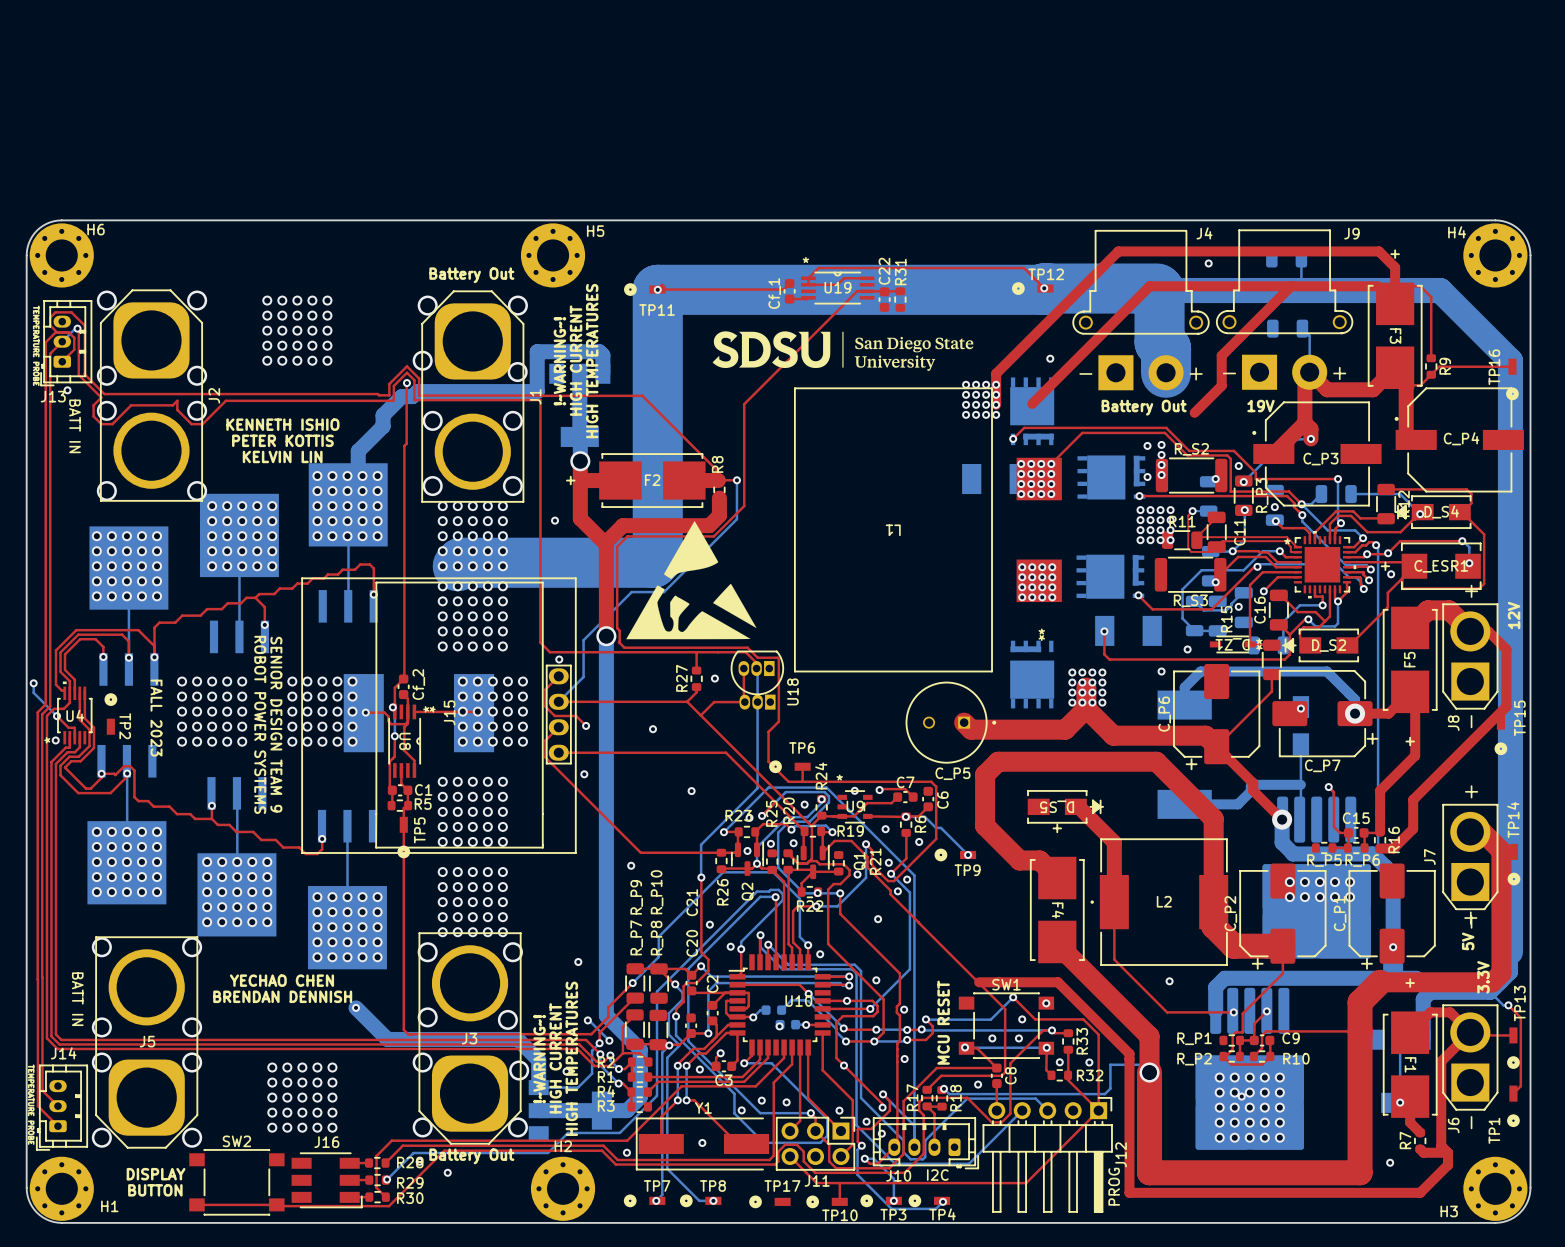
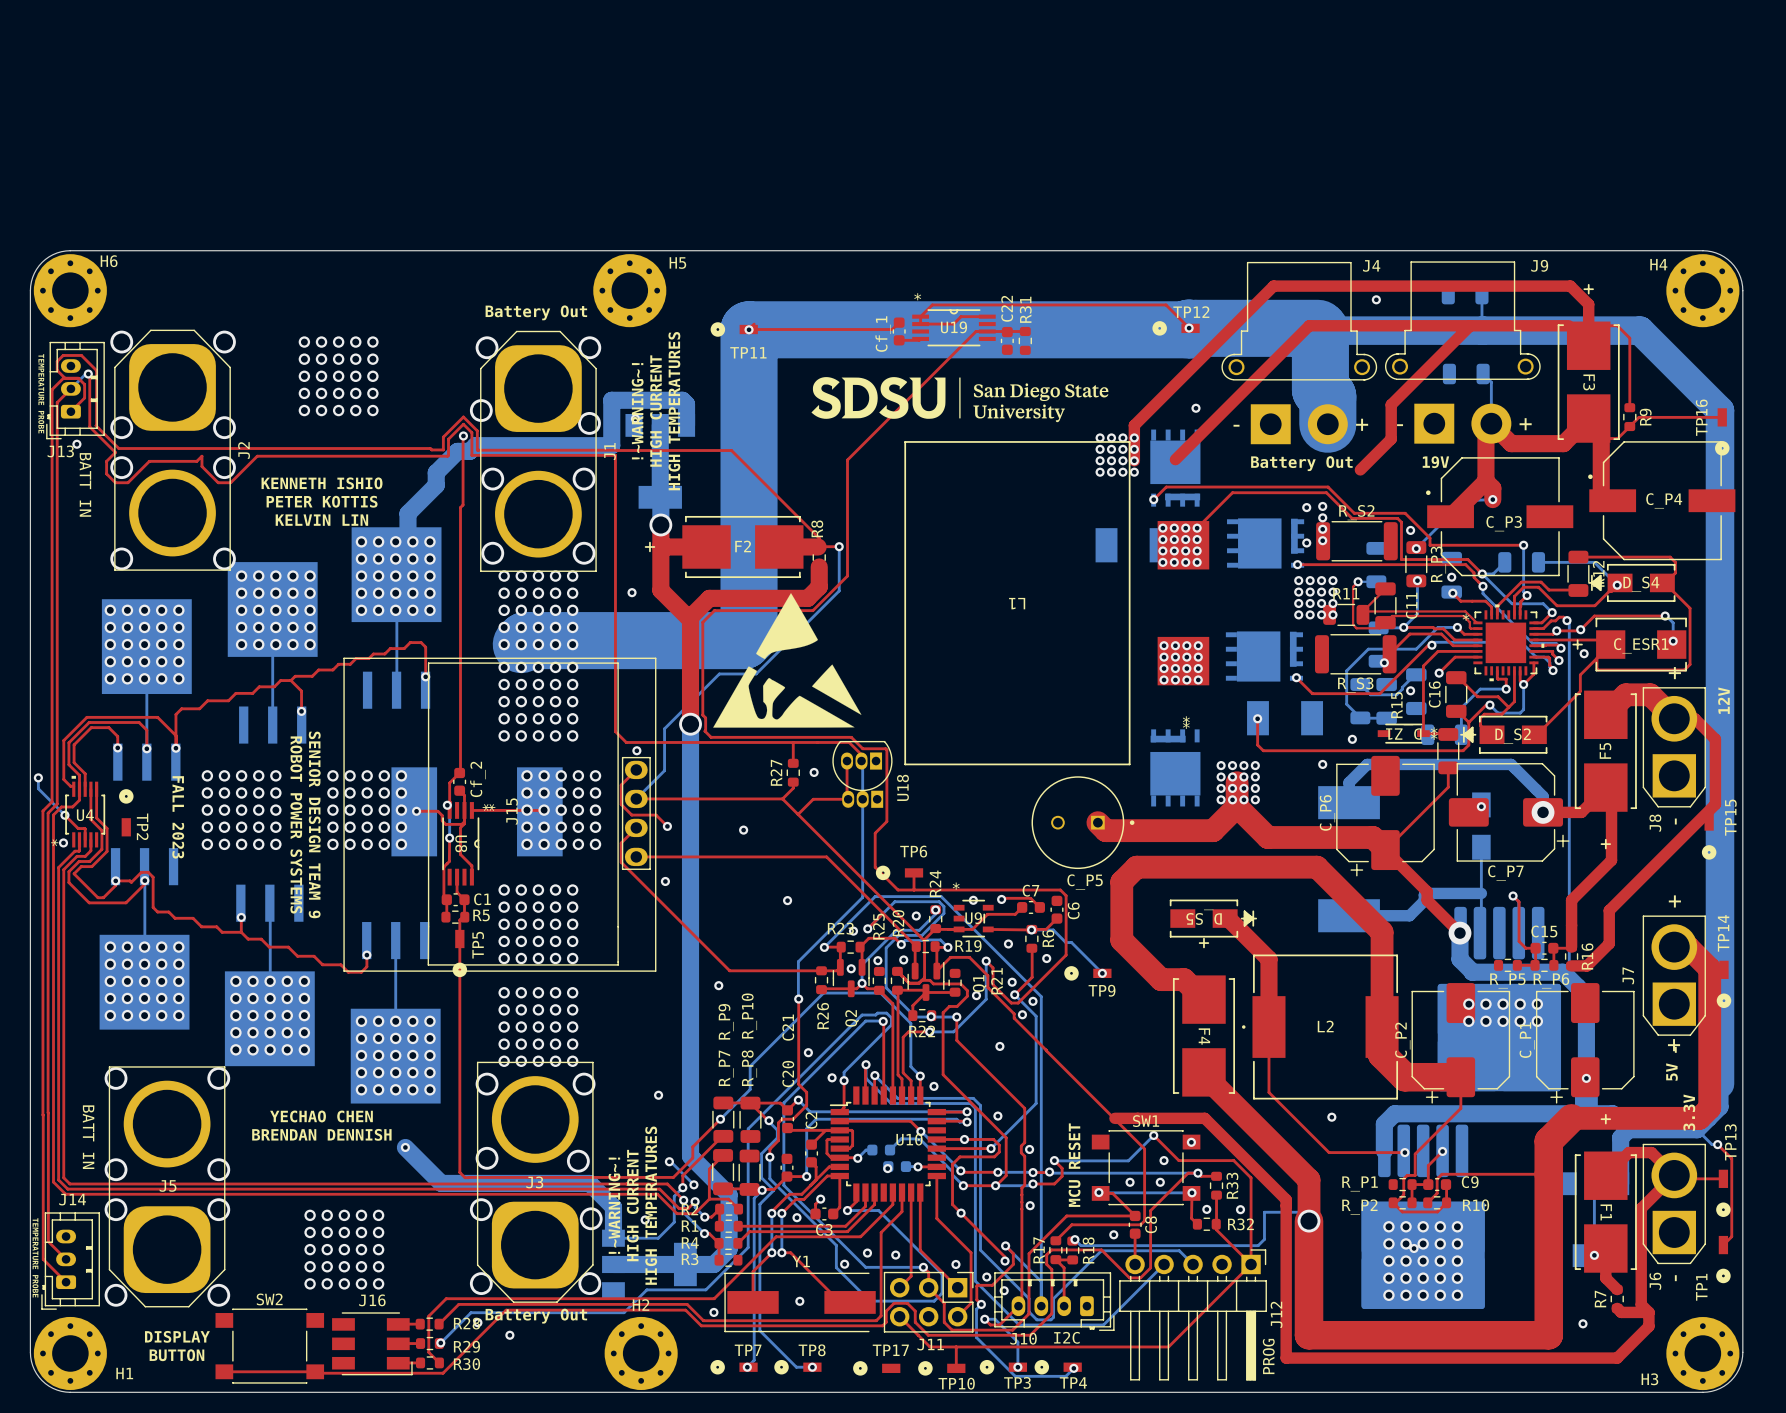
via: (1215, 479) -> none

